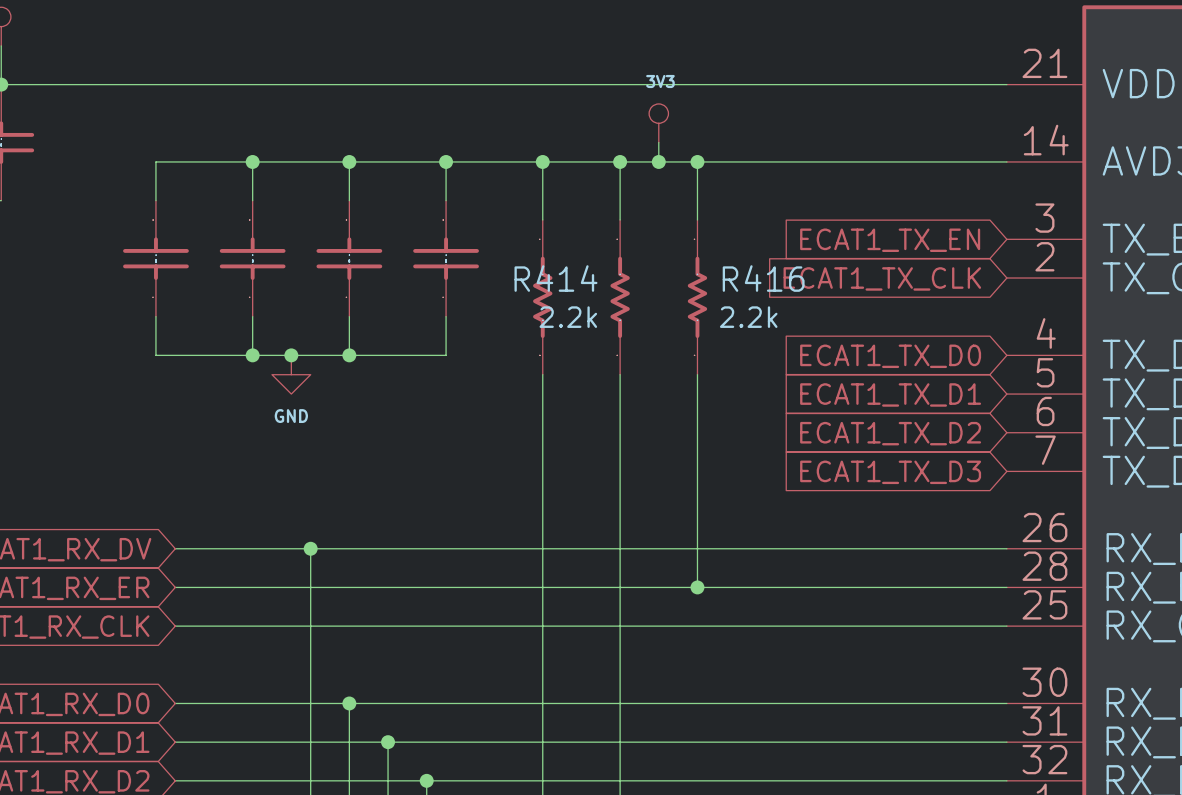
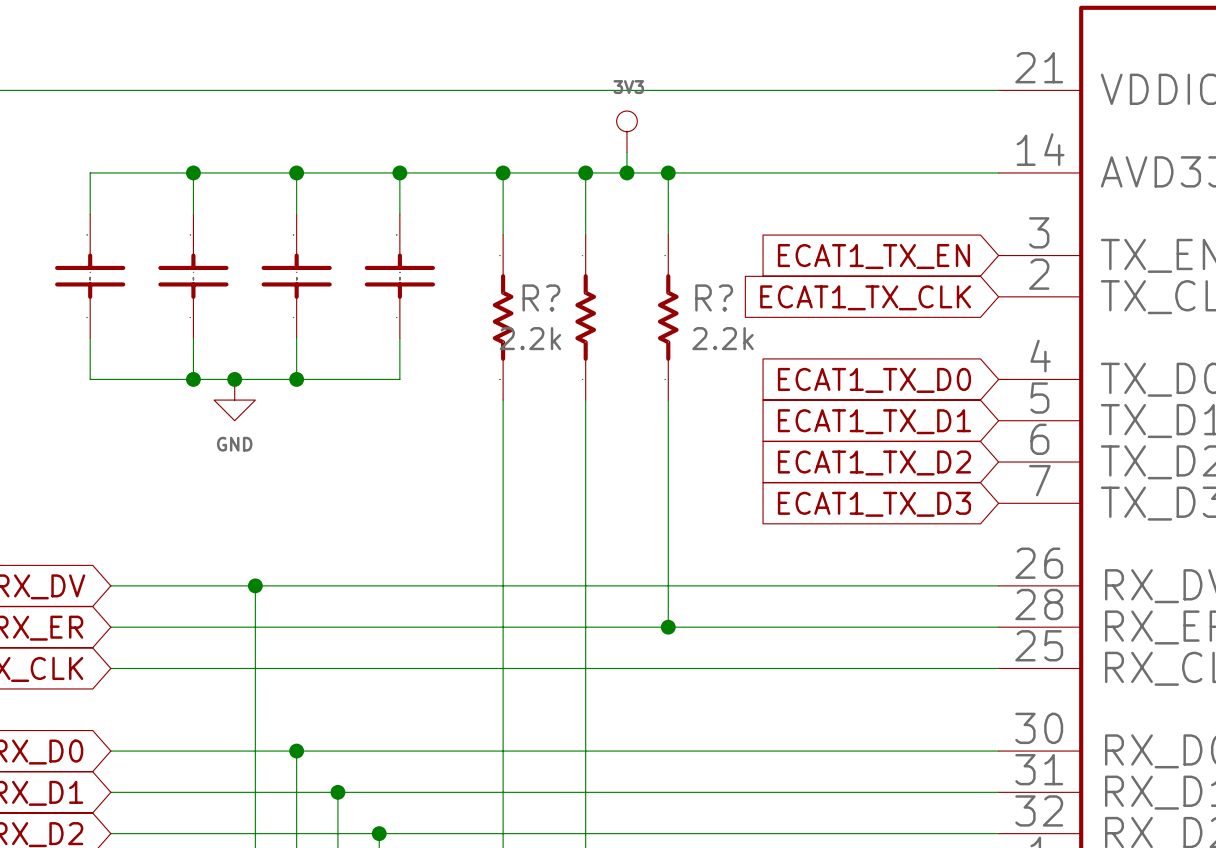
R414 name: R414 (555, 278) -> R? (541, 297)
R416 name: R416 (763, 278) -> R? (714, 297)

